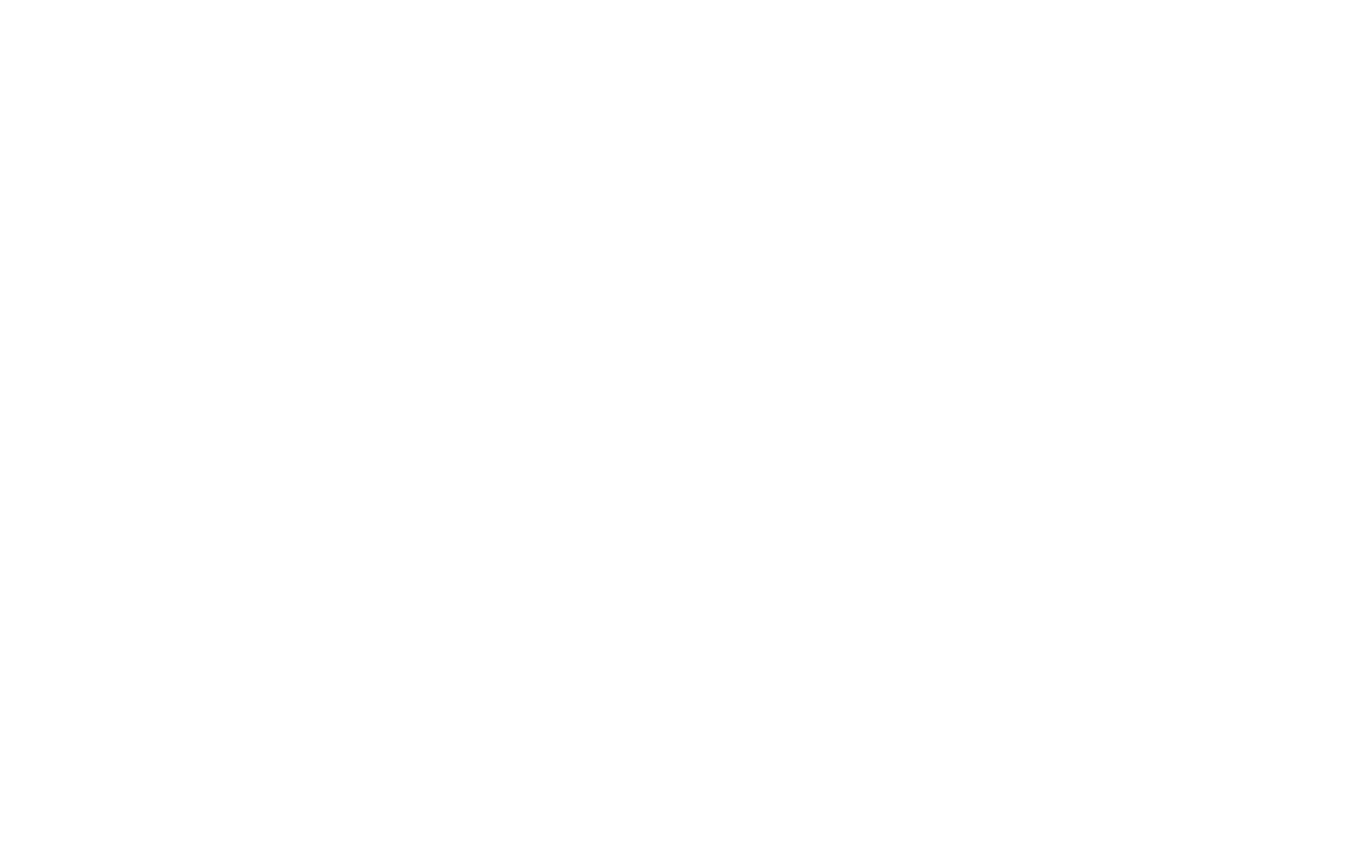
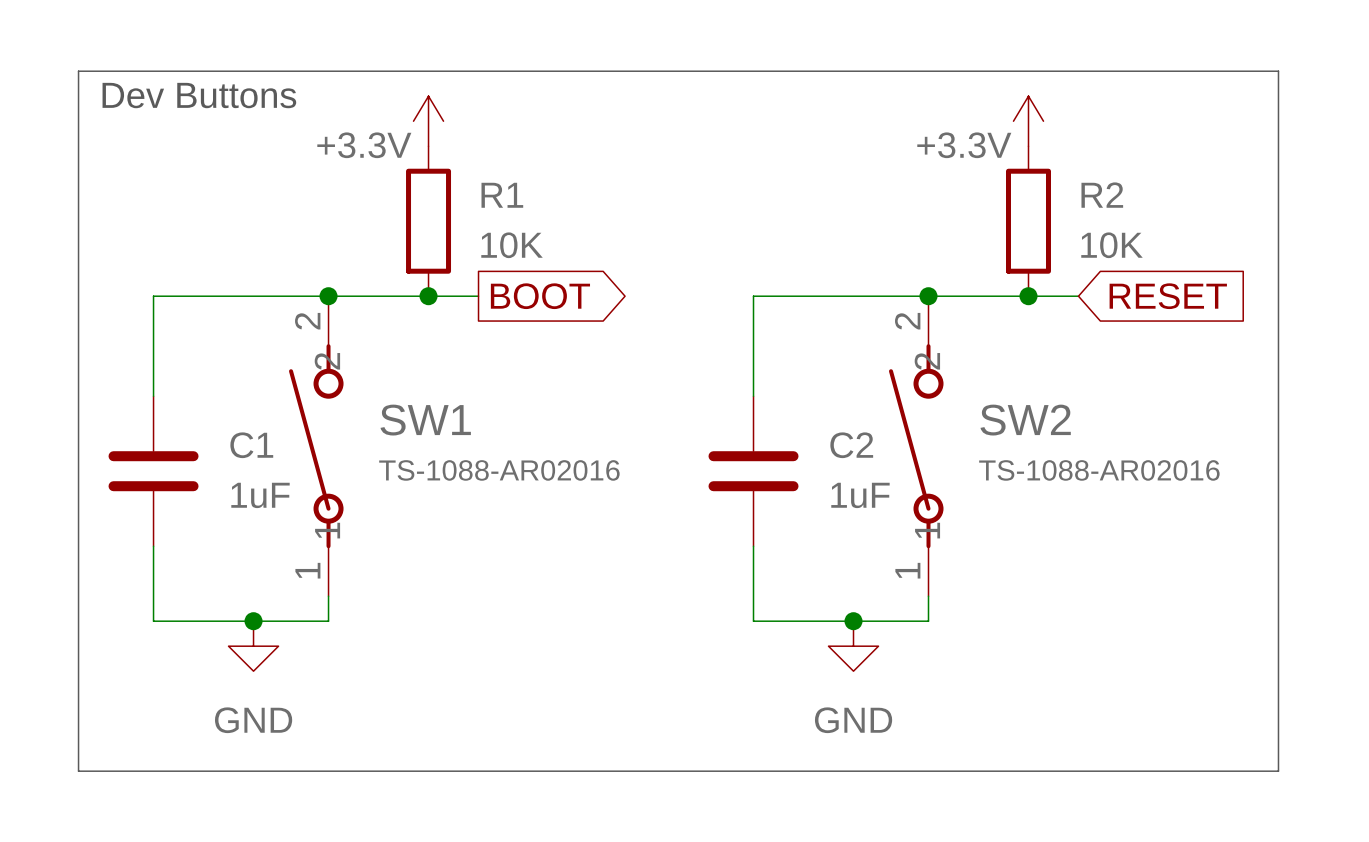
line: none -> (78, 71) (1278, 71) (1278, 771) (78, 771) (78, 71)
text: none -> Dev Buttons (199, 95)
power symbol: none -> +3.3V (428, 121)
power symbol: none -> +3.3V (1028, 121)
R1: none -> 10K (428, 221)
R2: none -> 10K (1028, 221)
junction: none -> (328, 296)
junction: none -> (428, 296)
wire: none -> (478, 296) (153, 296) (153, 396)
global label: none -> BOOT (540, 296)
junction: none -> (928, 296)
junction: none -> (1028, 296)
wire: none -> (1078, 296) (753, 296) (753, 396)
global label: none -> RESET (1168, 296)
SW1: none -> TS-1088-AR02016 (316, 446)
SW2: none -> TS-1088-AR02016 (916, 446)
C1: none -> 1uF (153, 471)
C2: none -> 1uF (753, 471)
wire: none -> (153, 546) (153, 621) (328, 621) (328, 596)
wire: none -> (753, 546) (753, 621) (928, 621) (928, 596)
junction: none -> (253, 621)
junction: none -> (853, 621)
power symbol: none -> GND (253, 646)
power symbol: none -> GND (853, 646)

